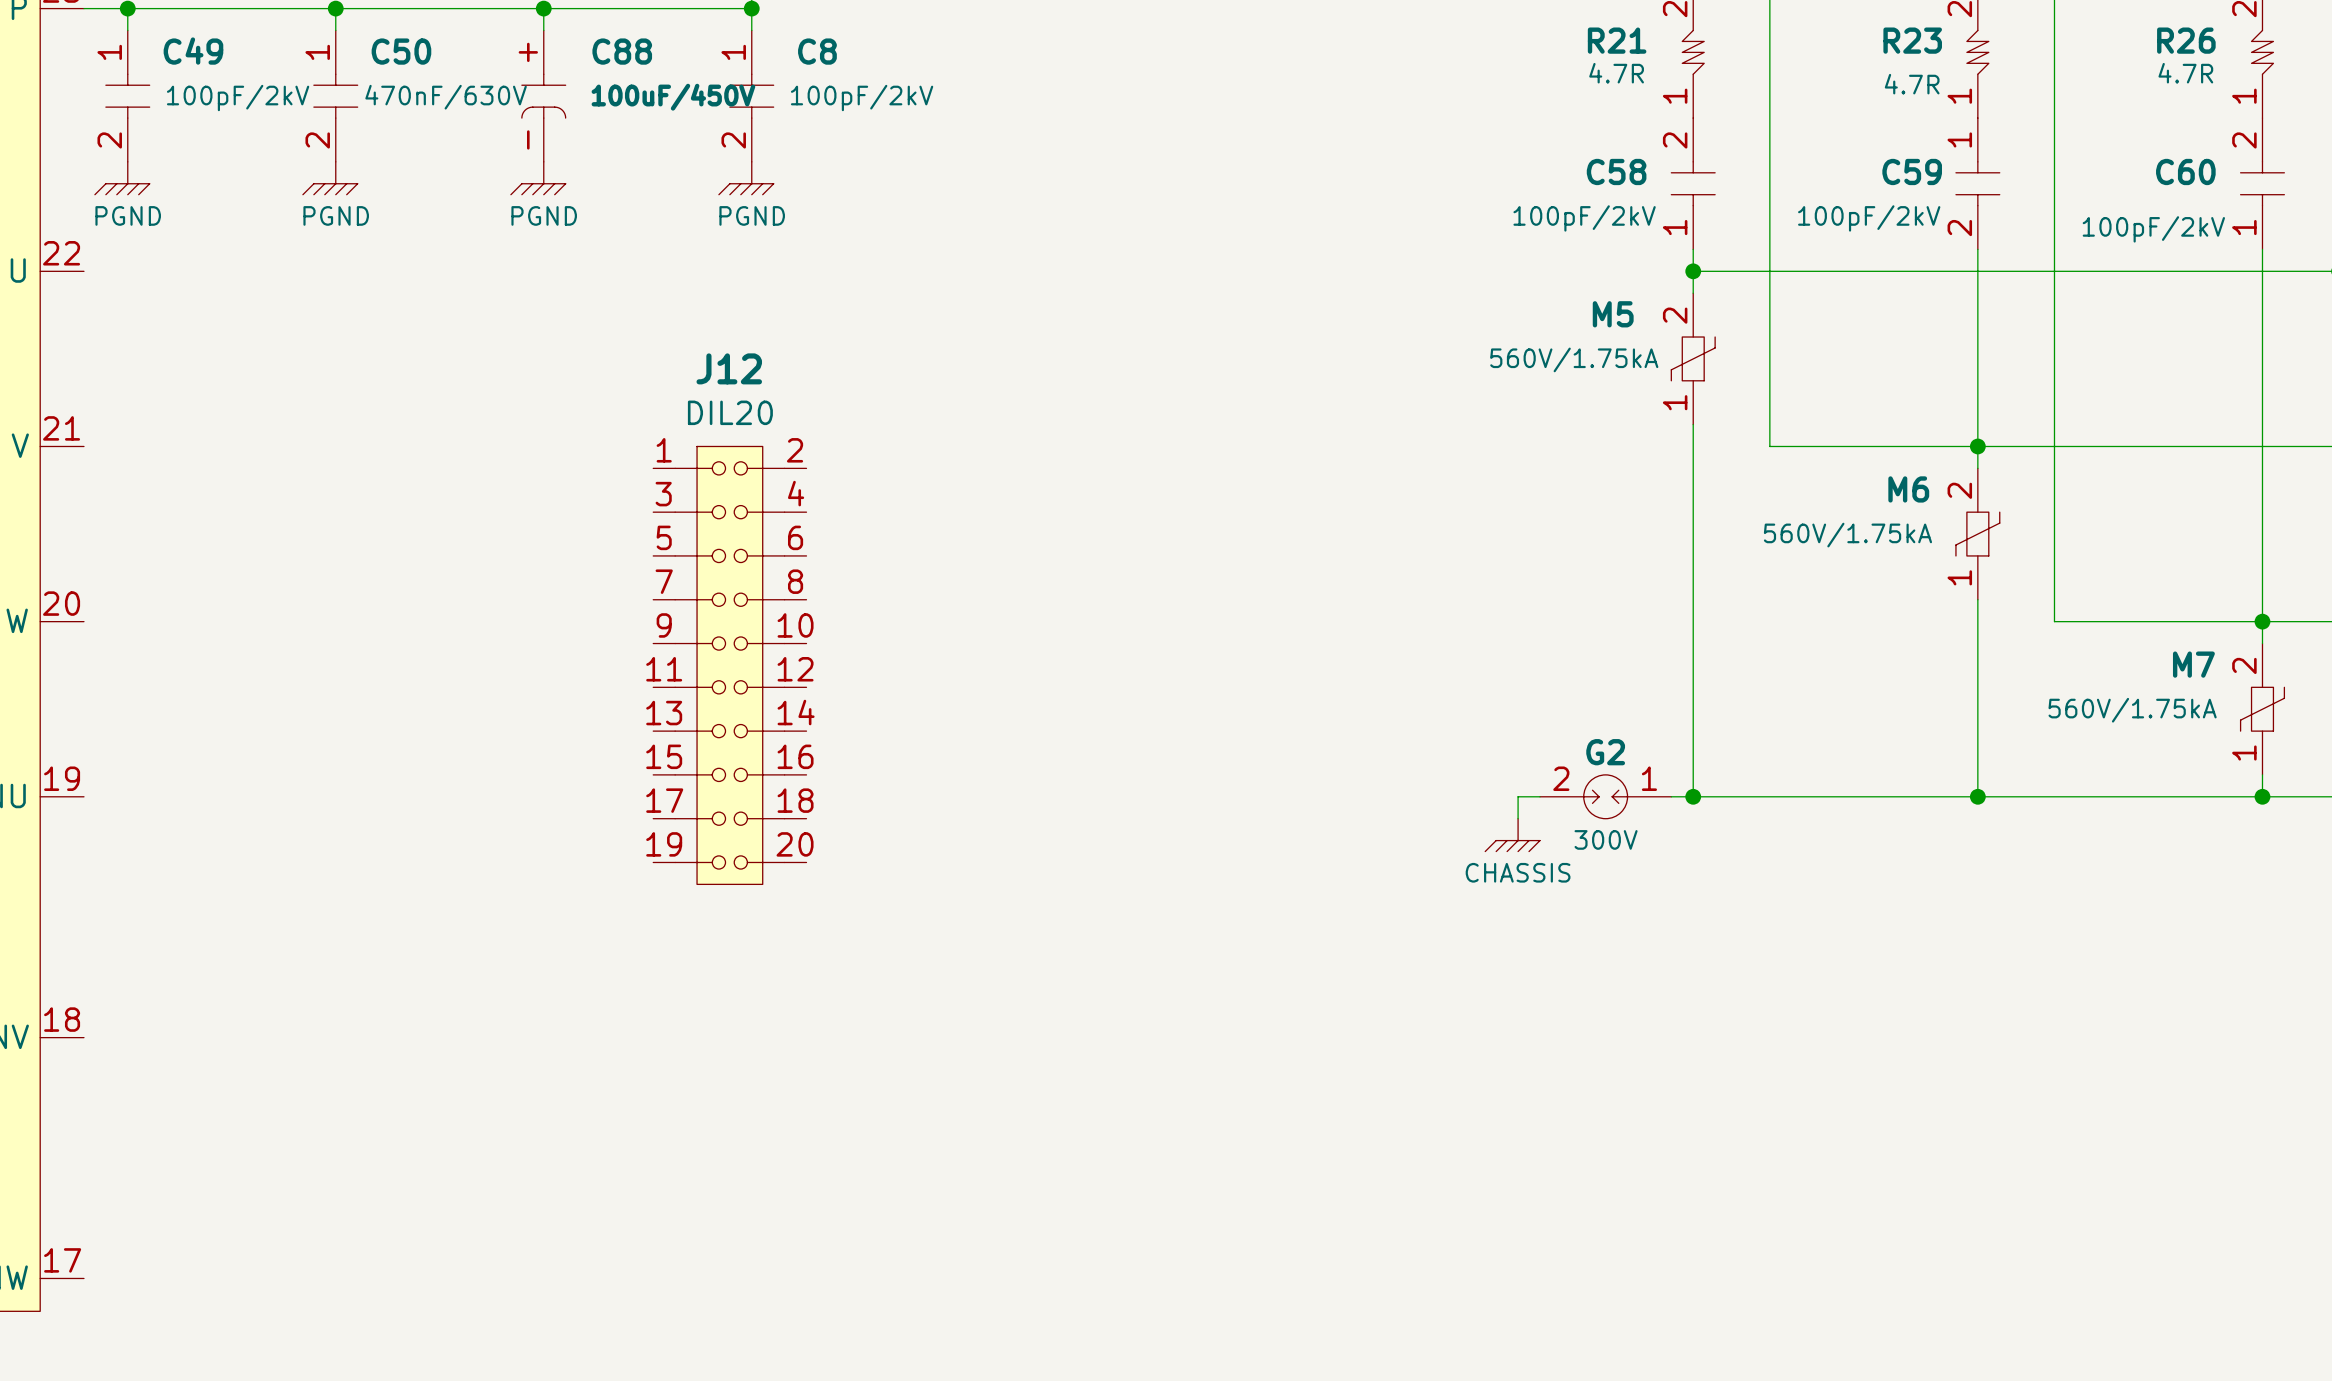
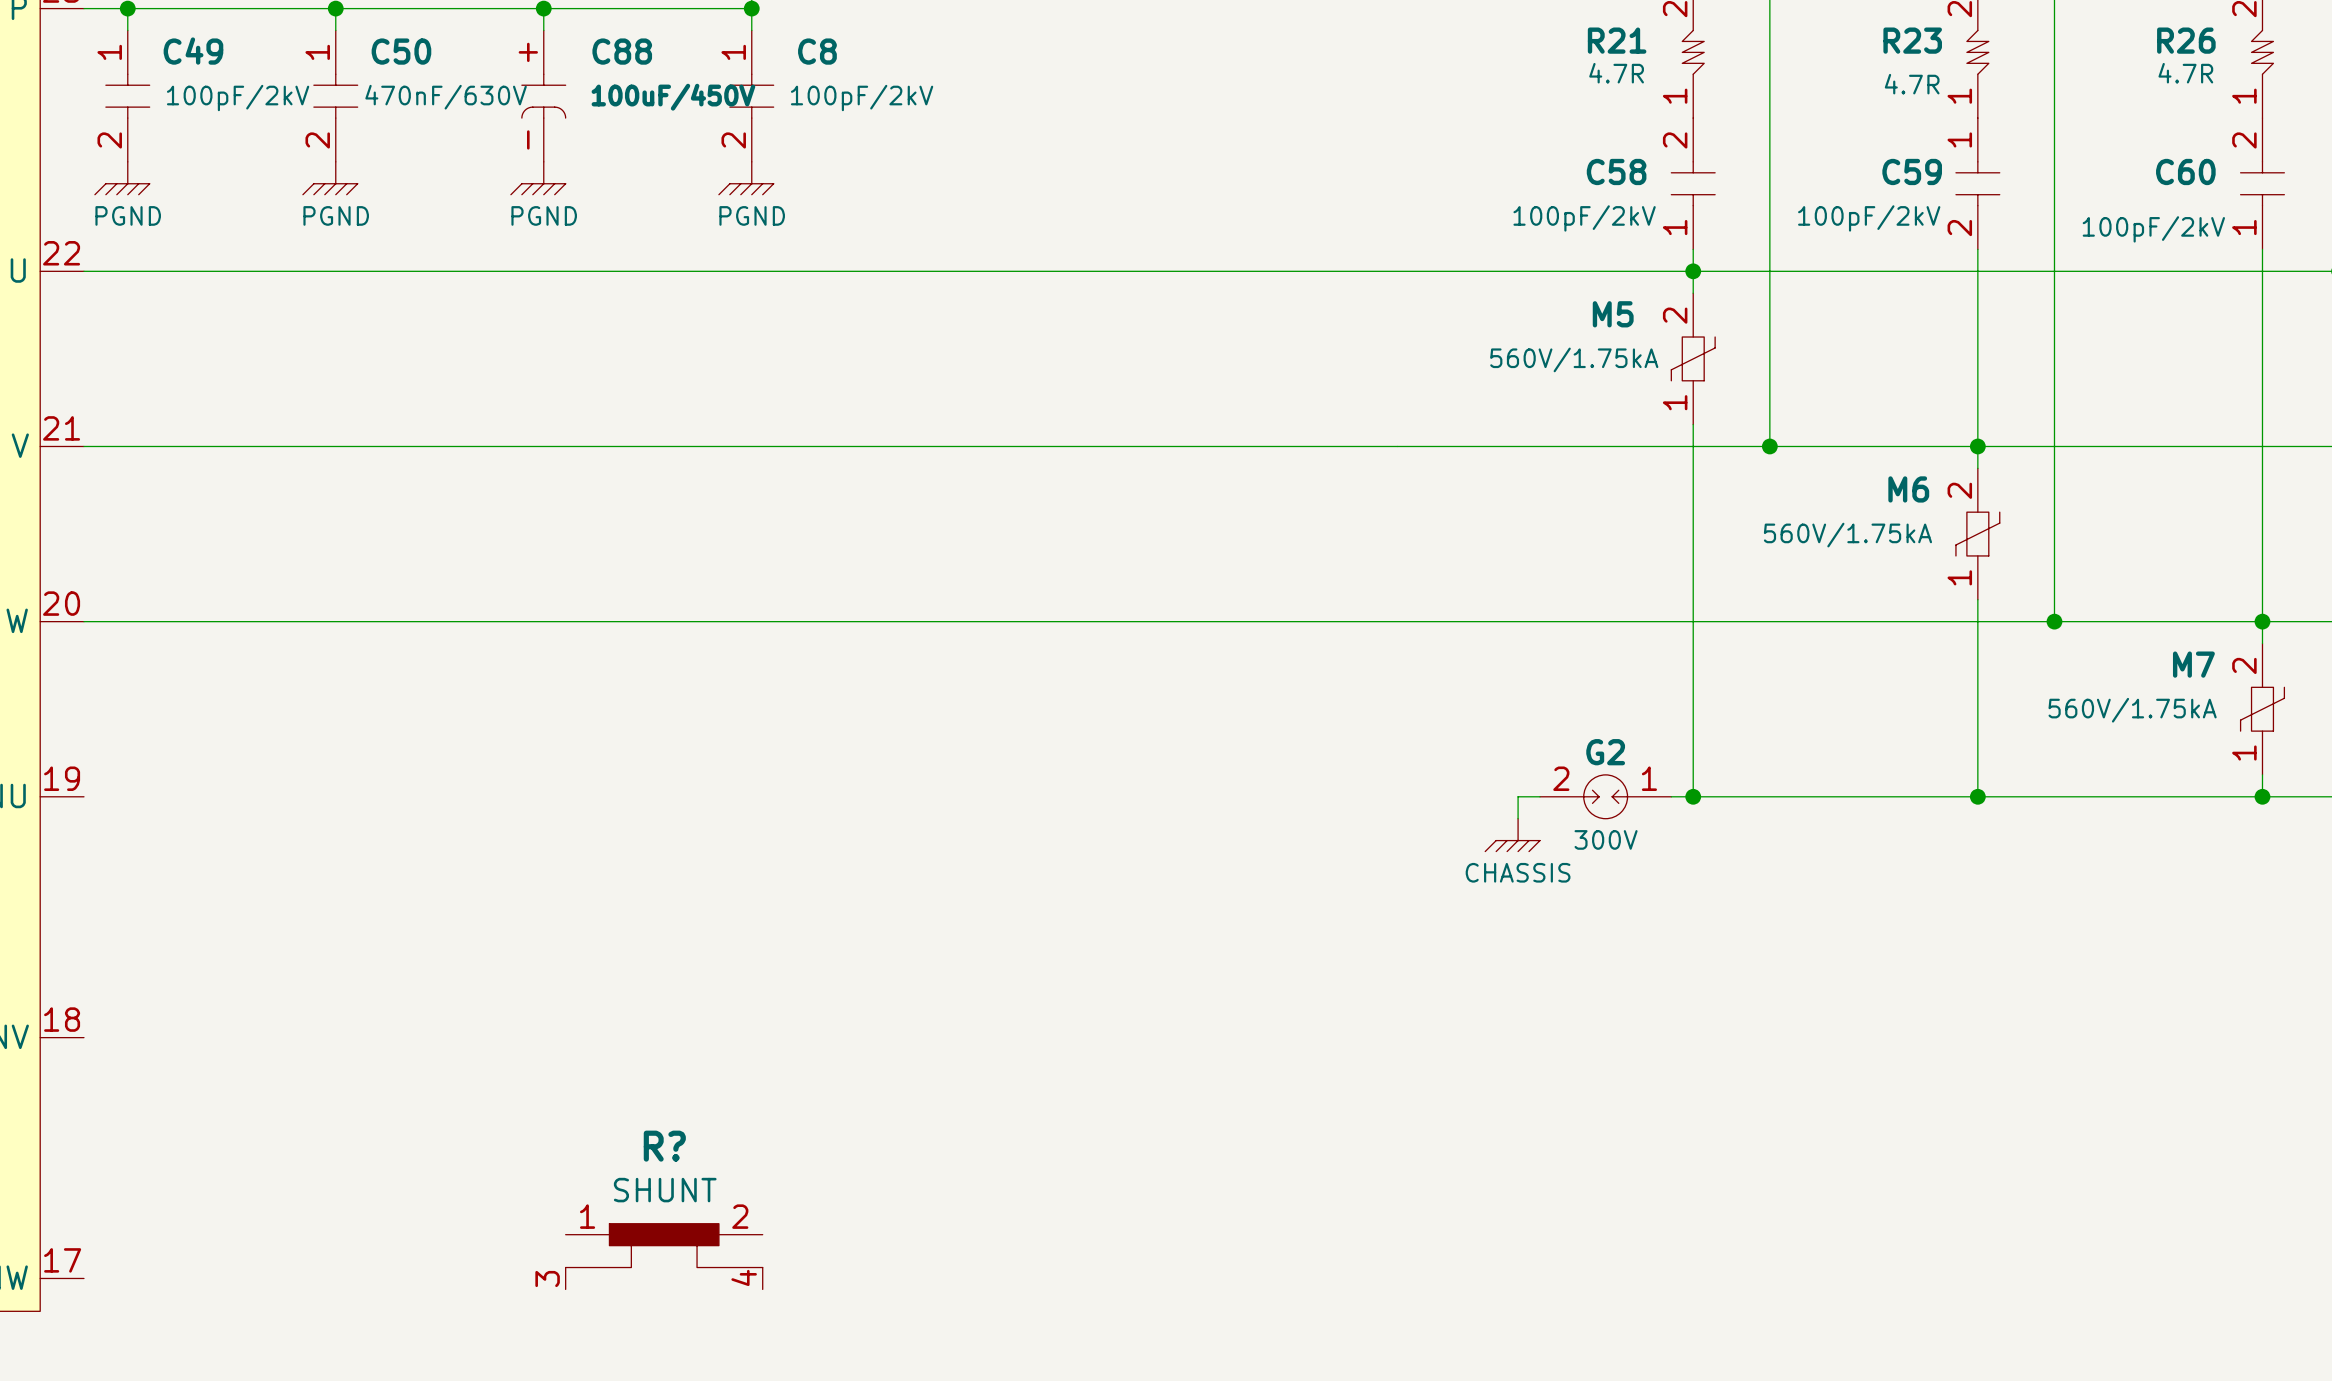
wire: none -> (83, 271) (1693, 271)
wire: none -> (83, 446) (1769, 446)
junction: none -> (1769, 446)
wire: none -> (83, 621) (2054, 621)
junction: none -> (2054, 621)
J12: DIL20 (729, 665) -> none
R?: none -> SHUNT (664, 1256)

